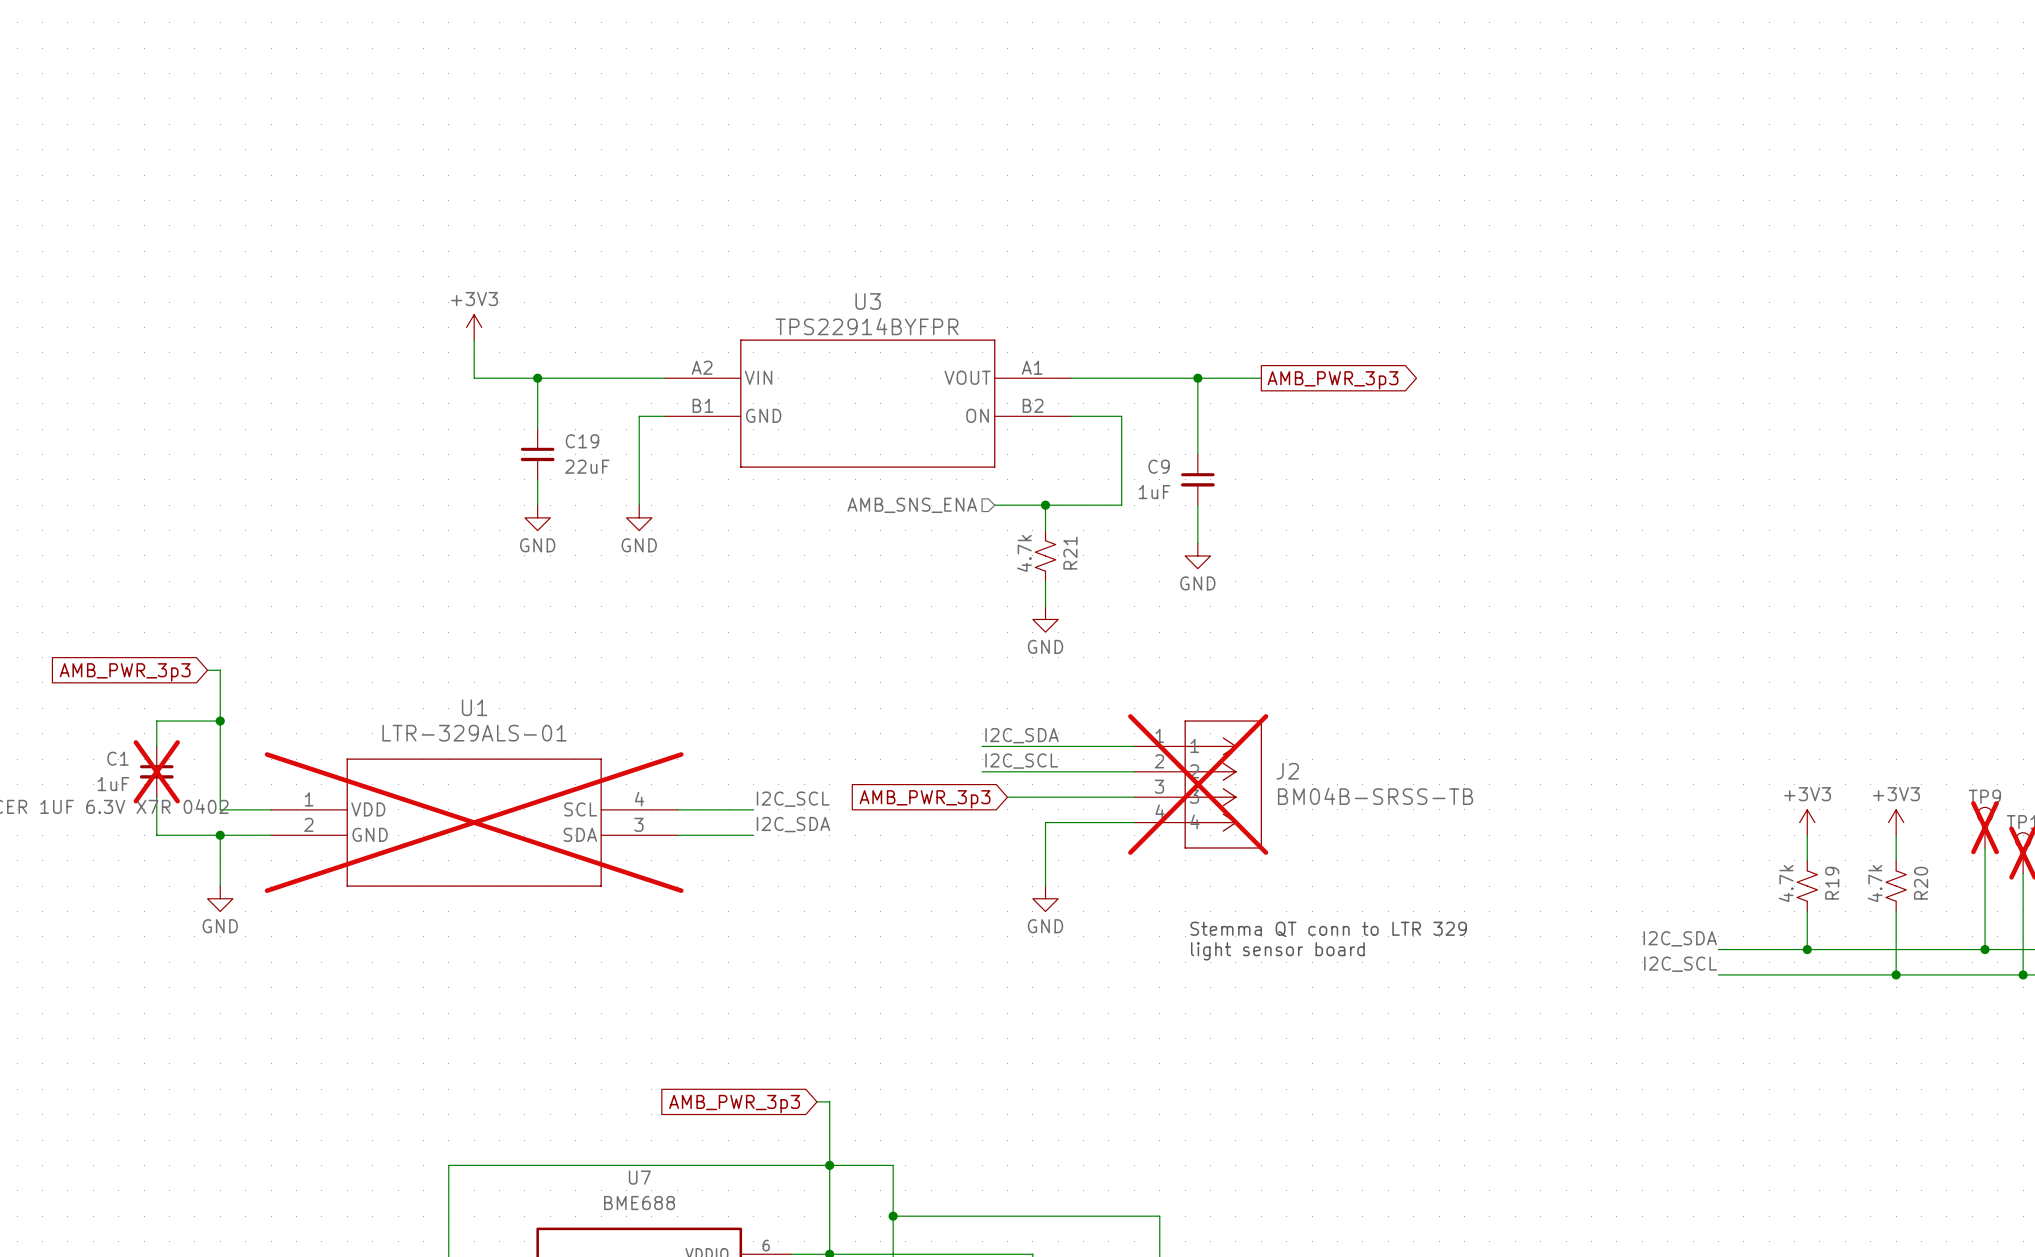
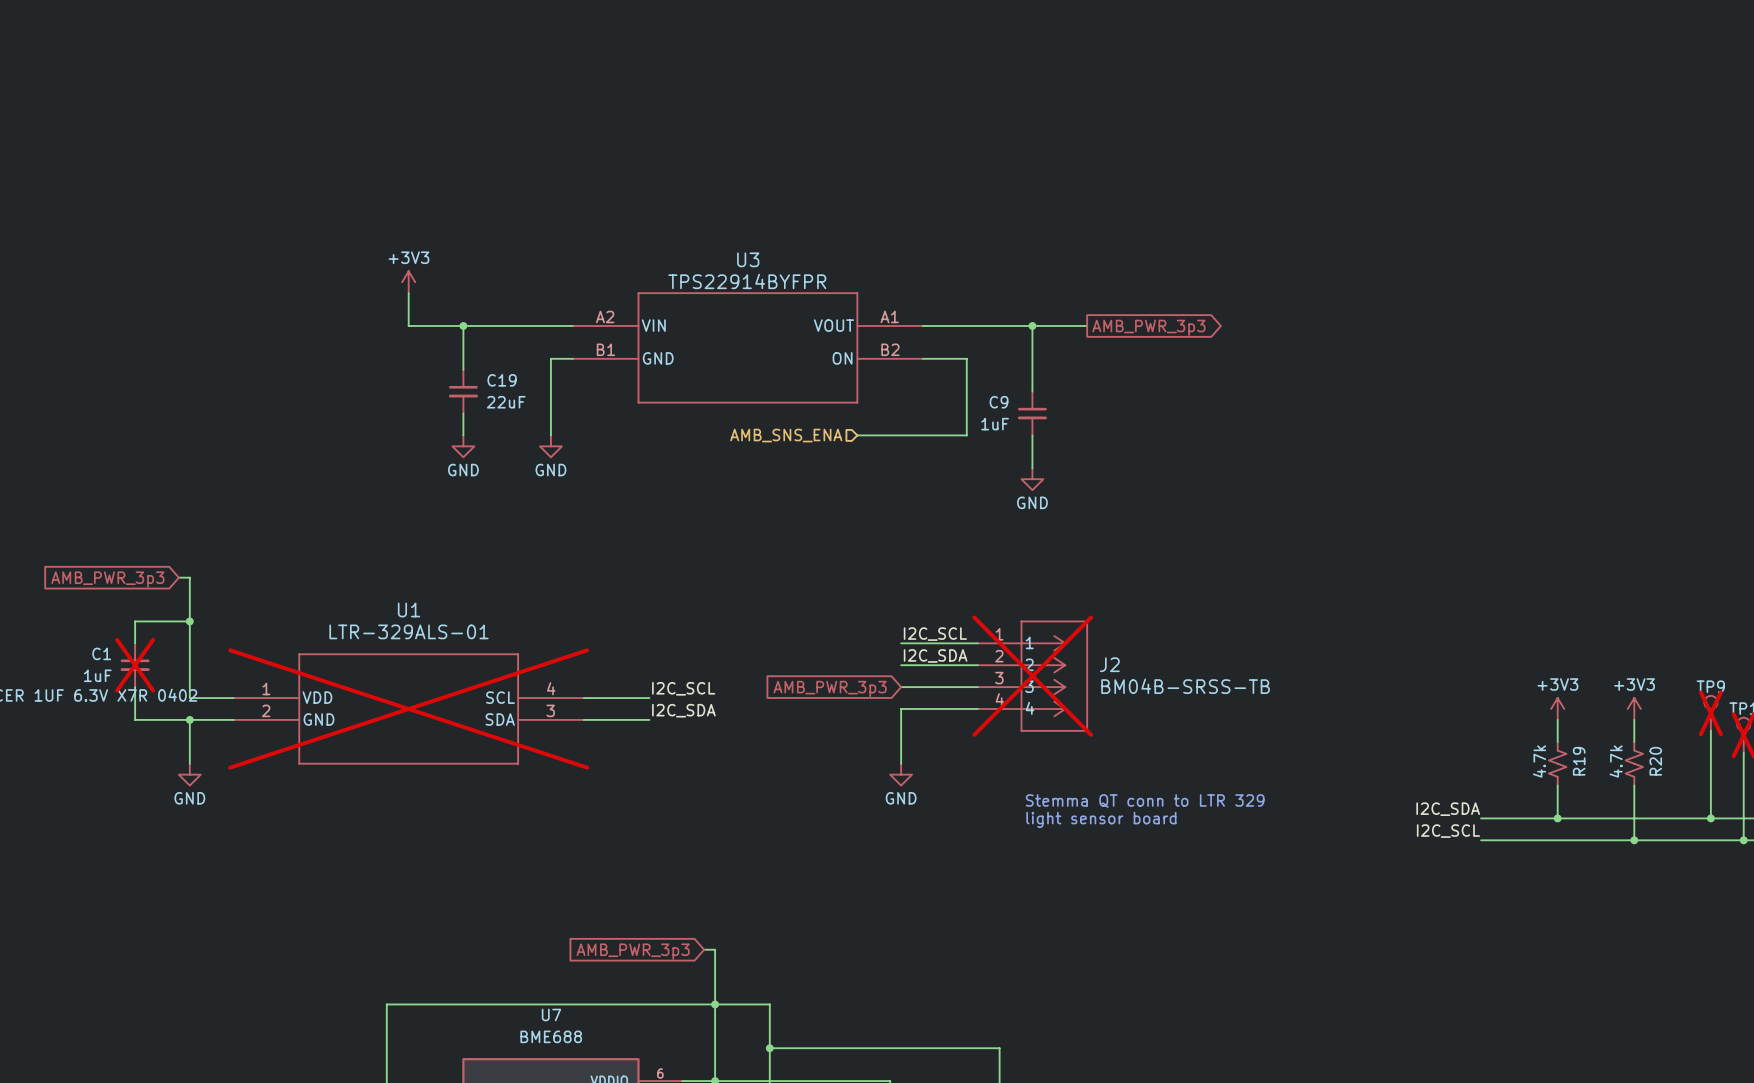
wire: (1045, 505) (1045, 530) -> none
junction: (1045, 505) -> none
R21: 4.7k (1045, 555) -> none
wire: (1045, 581) (1045, 606) -> none
power symbol: GND (1045, 619) -> none
label position: I2C_SDA (1022, 735) -> I2C_SDA (935, 655)
wire: (982, 746) (1045, 746) -> none
label position: I2C_SCL (1021, 761) -> I2C_SCL (935, 634)
wire: (982, 771) (1045, 771) -> none
wire: (1007, 797) (1045, 797) -> none
global label position: AMB_PWR_3p3 (925, 799) -> AMB_PWR_3p3 (830, 688)

